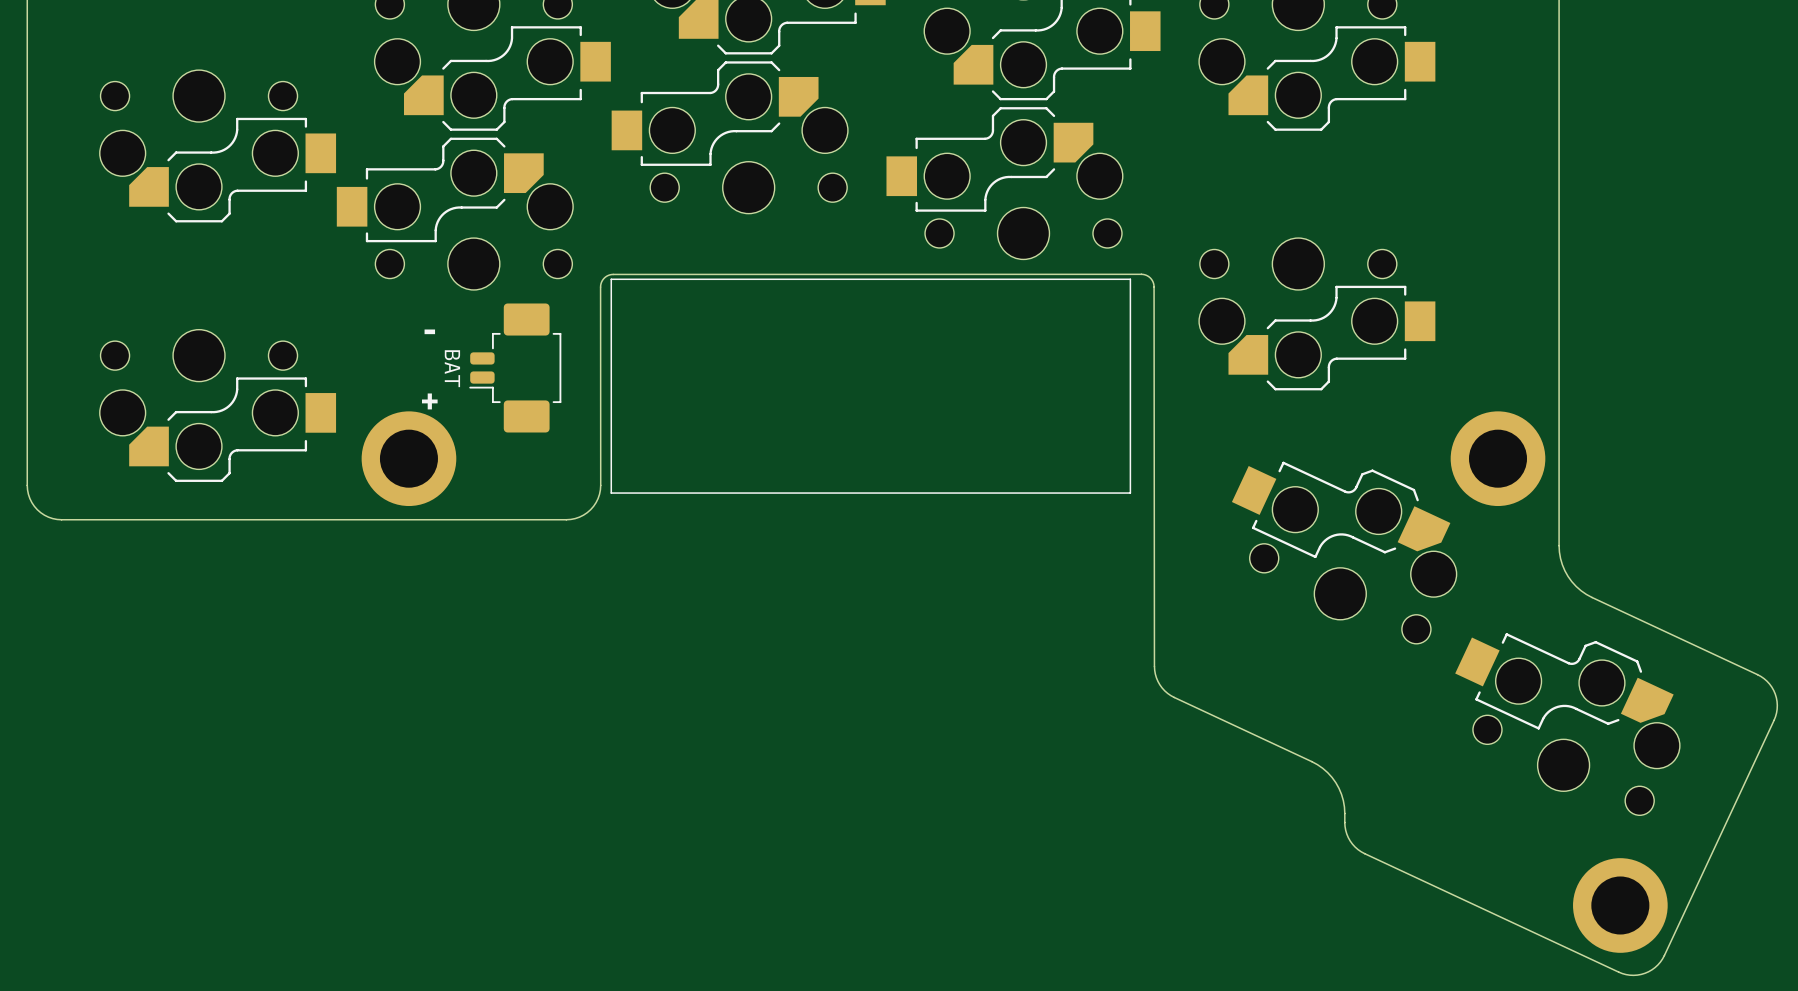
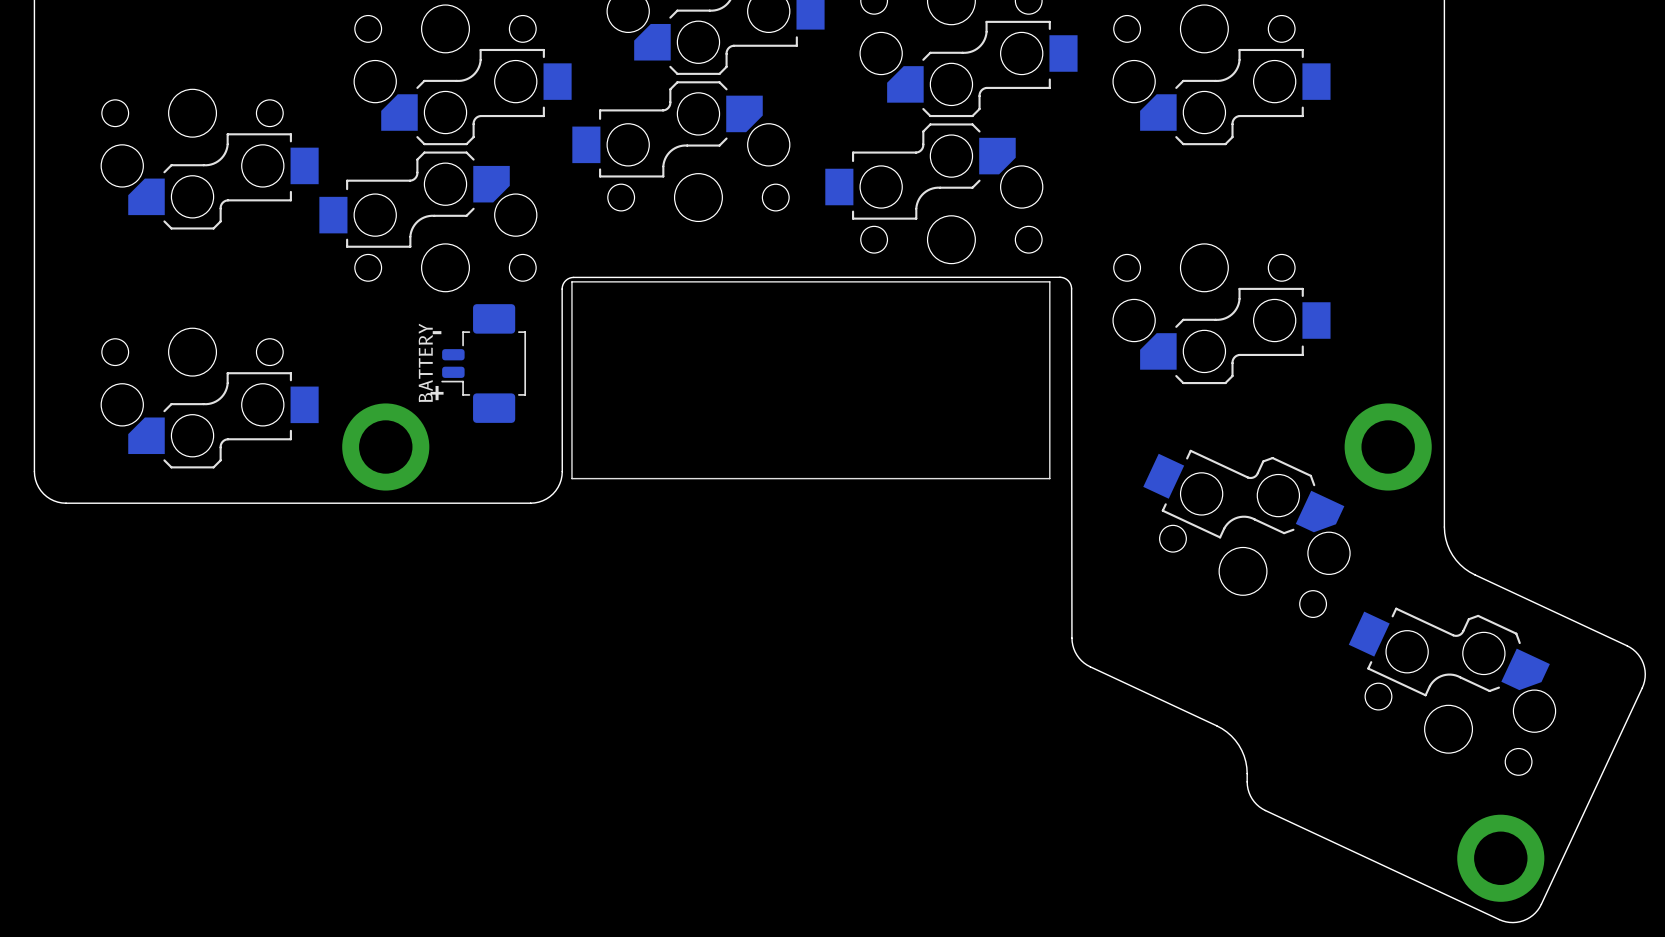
text position: - (429, 331) -> - (437, 332)
text: none -> BATTERY (425, 362)
BAT name: BAT (452, 368) -> none
text position: + (429, 401) -> + (437, 393)

